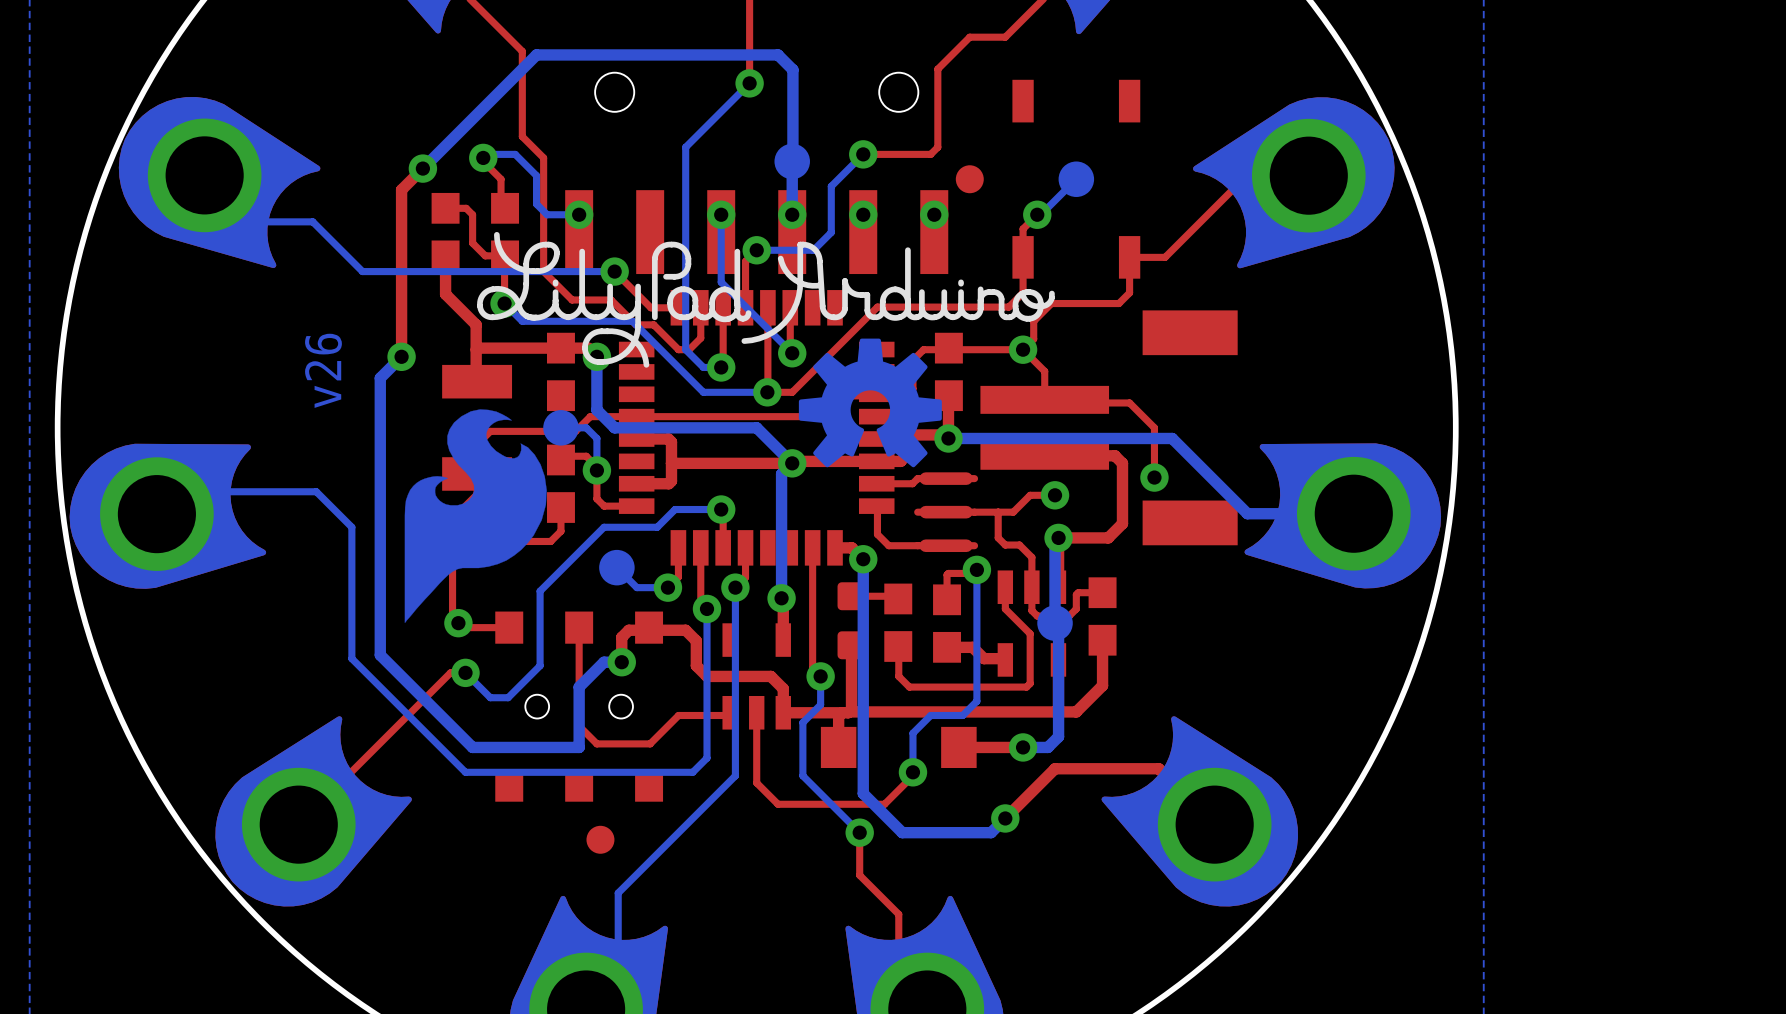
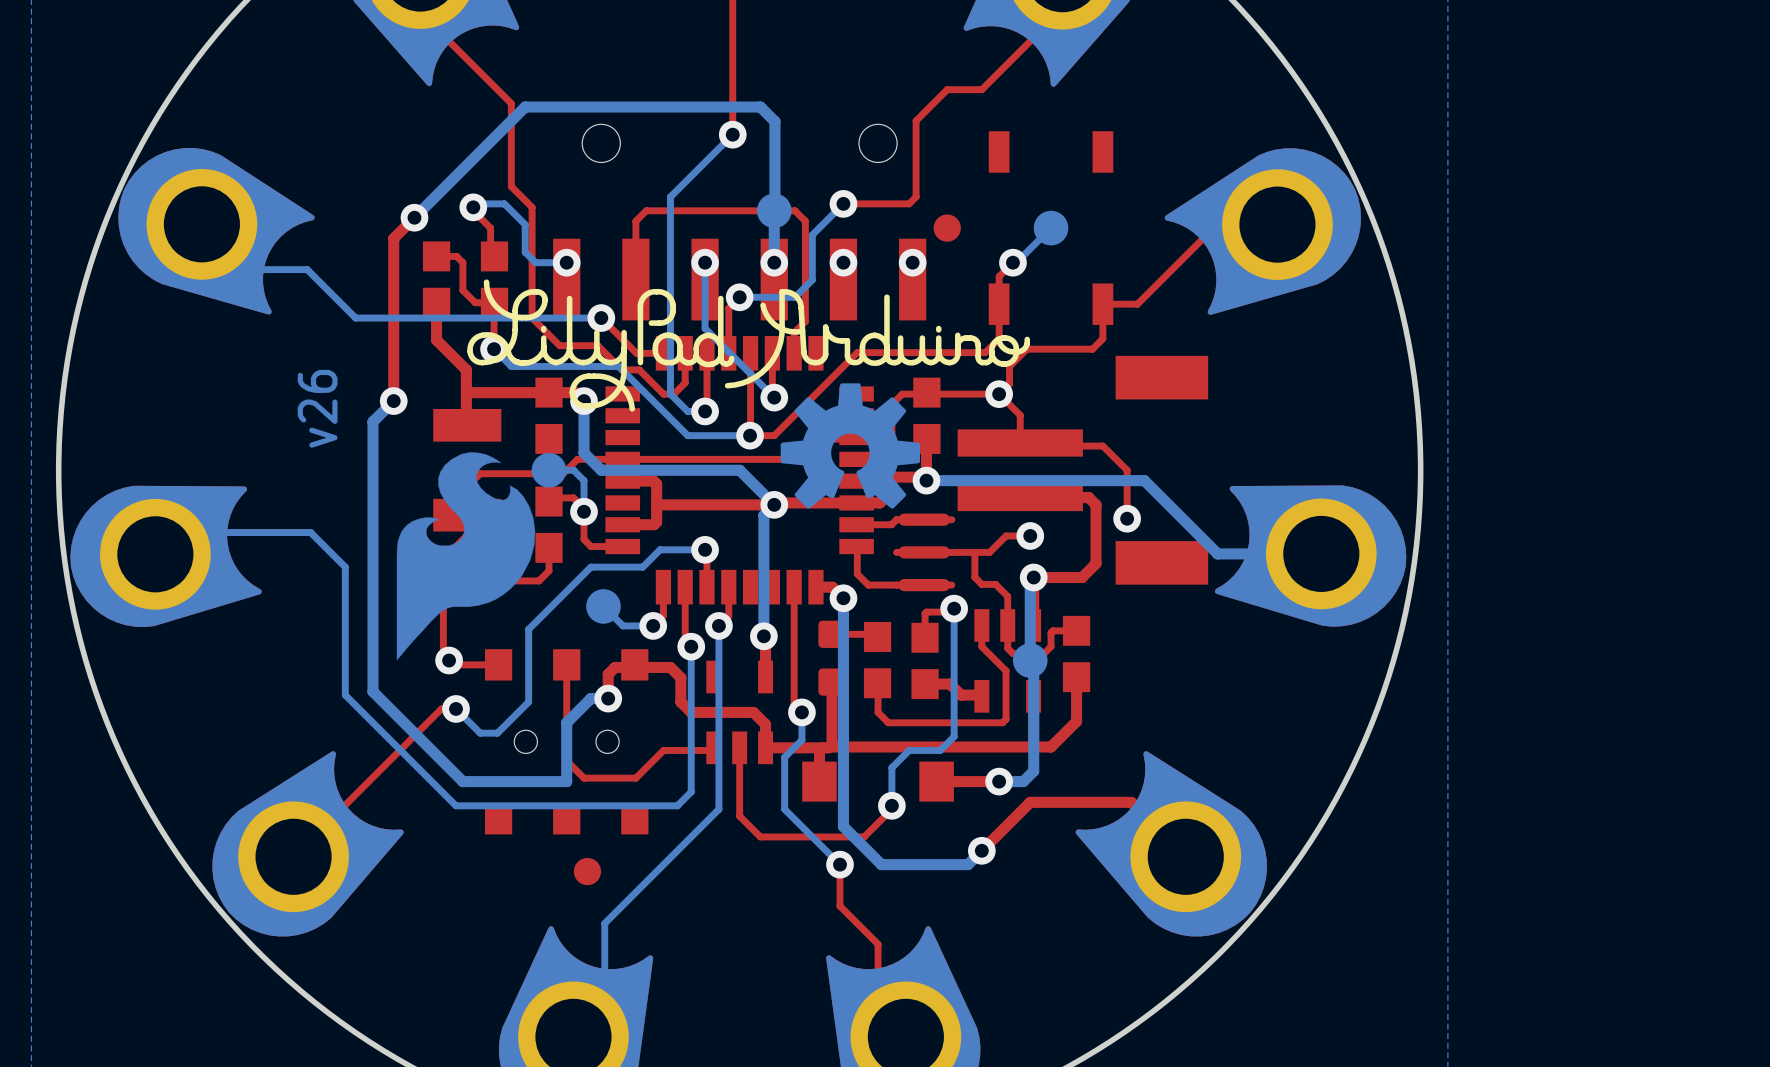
top track: none -> (635, 279) (635, 221) (646, 210) (795, 210) (805, 221) (805, 321) (794, 332) (794, 353)

